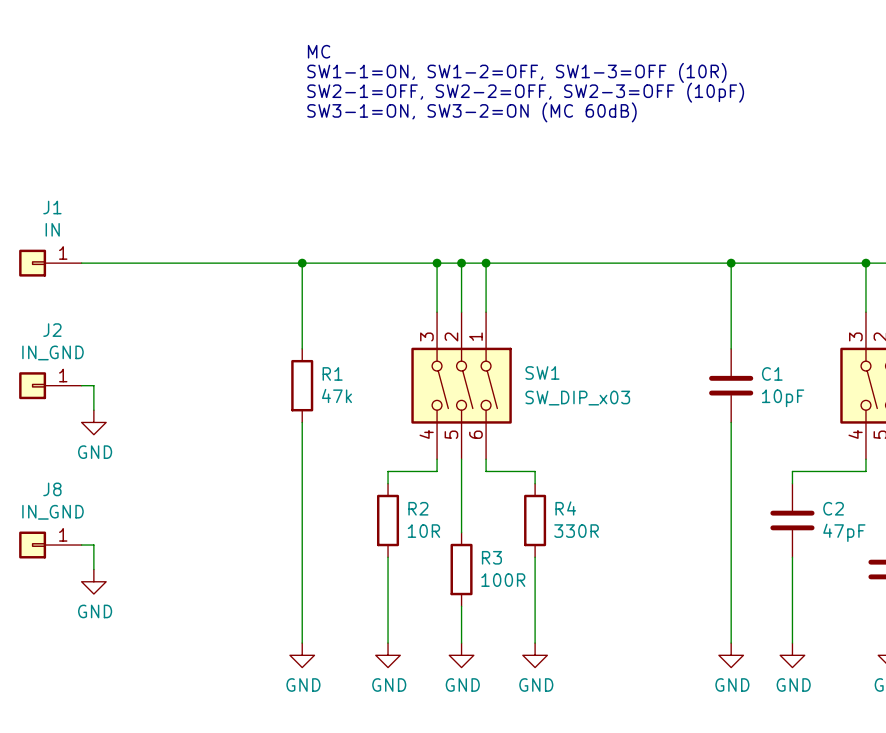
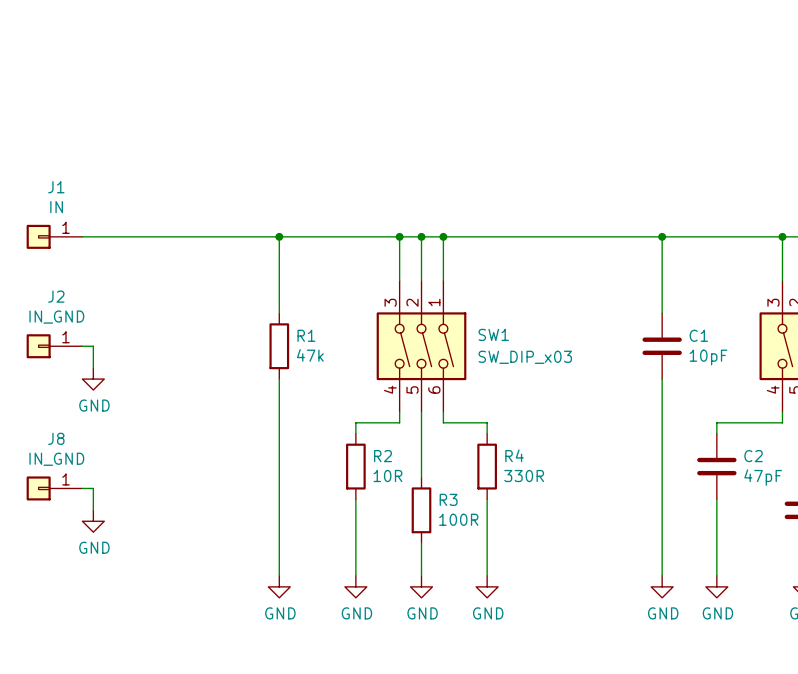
text: MC (319, 51) -> none
text: SW1-1=ON, SW1-2=OFF, SW1-3=OFF (10R) (516, 72) -> none
text: SW2-1=OFF, SW2-2=OFF, SW2-3=OFF (10pF) (525, 92) -> none
text: SW3-1=ON, SW3-2=ON (MC 60dB) (471, 112) -> none

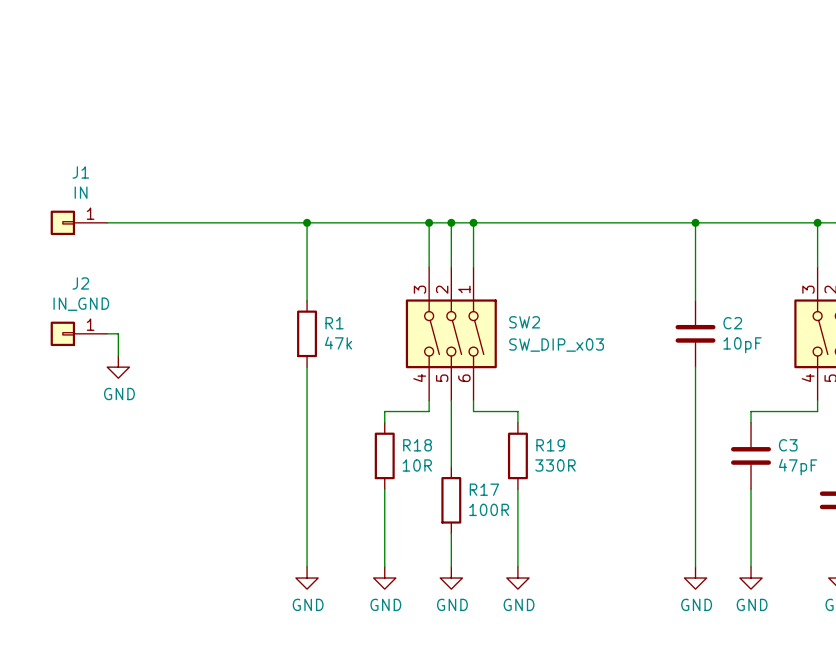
SW1 name: SW1 (493, 334) -> SW2 (524, 322)
C1 name: C1 (698, 335) -> C2 (732, 323)
R4 name: R4 (514, 455) -> R19 (550, 445)
R2 name: R2 (382, 456) -> R18 (417, 445)
C2 name: C2 (753, 456) -> C3 (788, 445)
J8: IN_GND (54, 488) -> none
wire: (82, 488) (93, 488) (93, 510) -> none
R3 name: R3 (448, 499) -> R17 (484, 489)
power symbol: GND (93, 521) -> none

